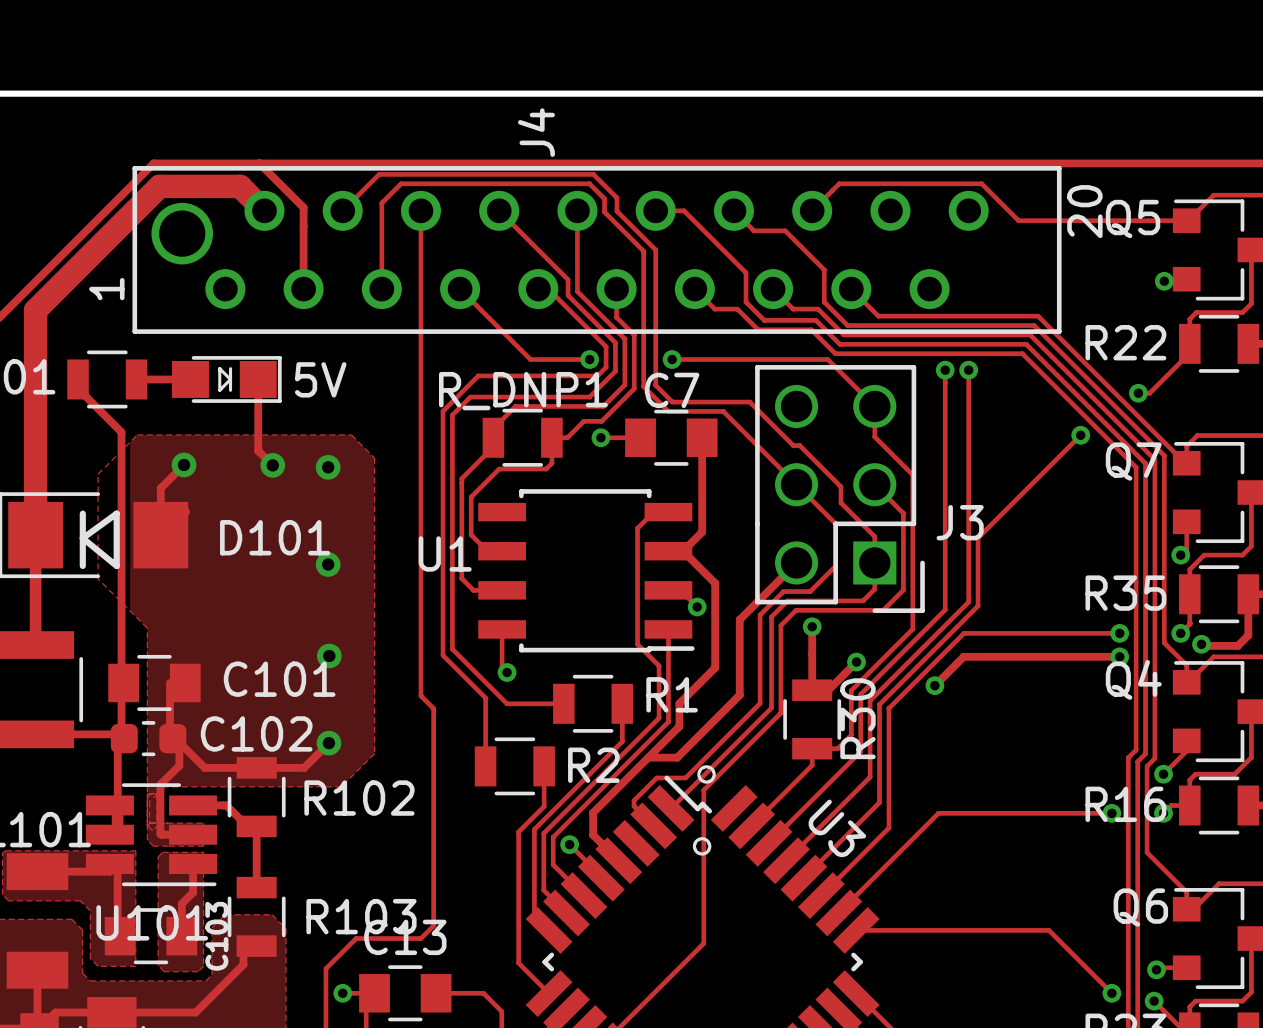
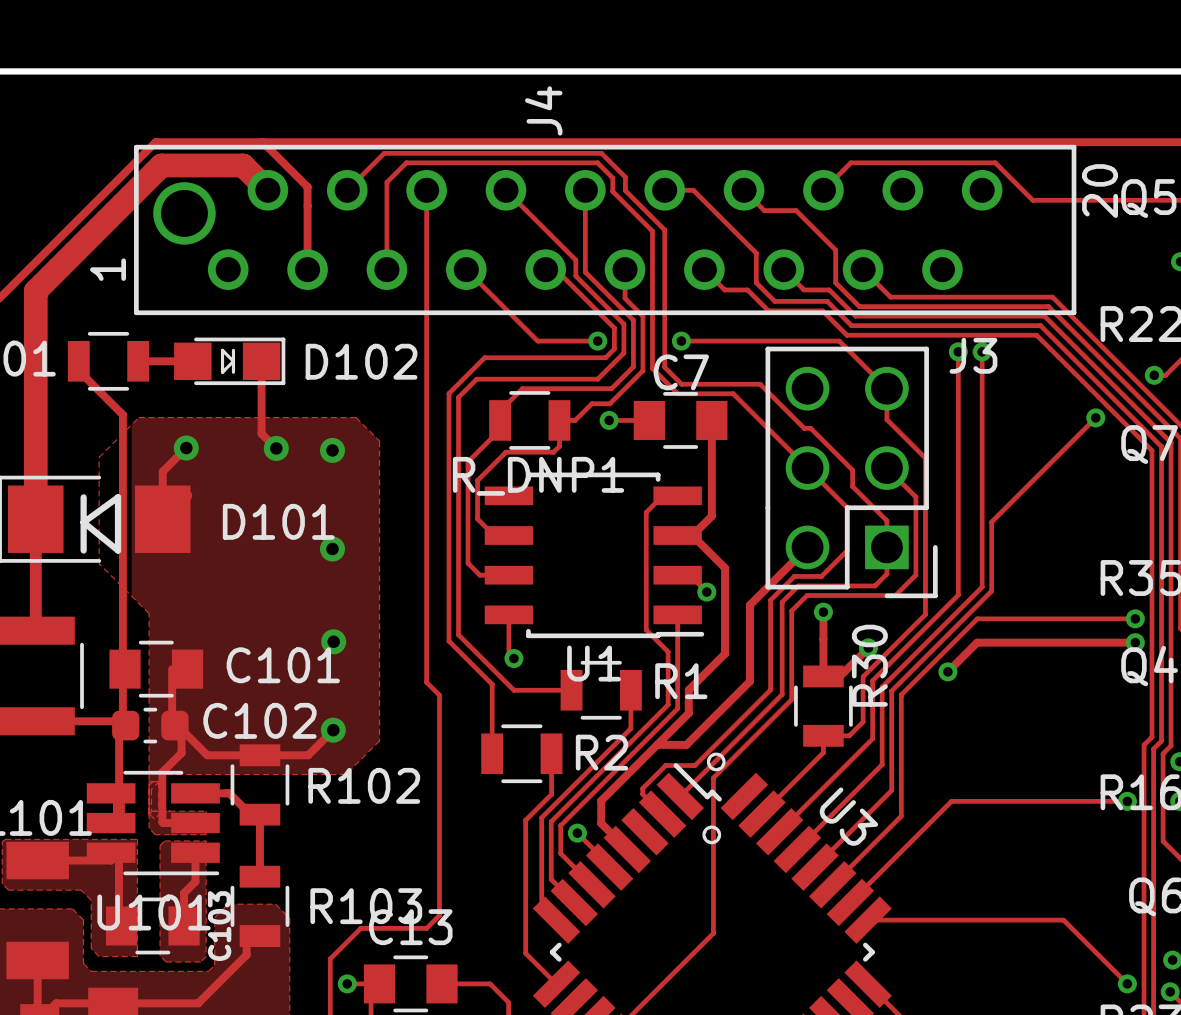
5V name: 5V (320, 379) -> D102 (361, 361)
R_DNP1 name position: R_DNP1 (523, 391) -> R_DNP1 (538, 476)
J3 name position: J3 (960, 522) -> J3 (973, 355)
U1 name position: U1 (445, 553) -> U1 (594, 663)
R30 name position: R30 (857, 718) -> R30 (869, 665)

